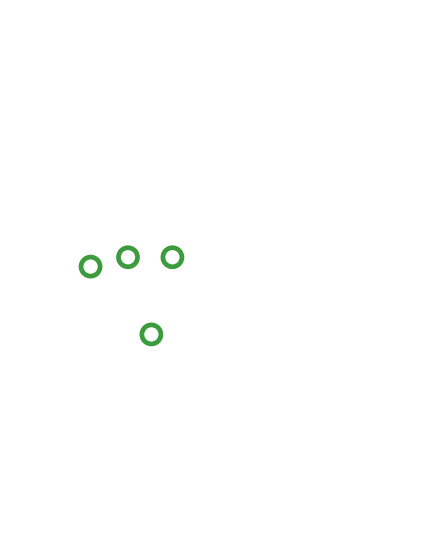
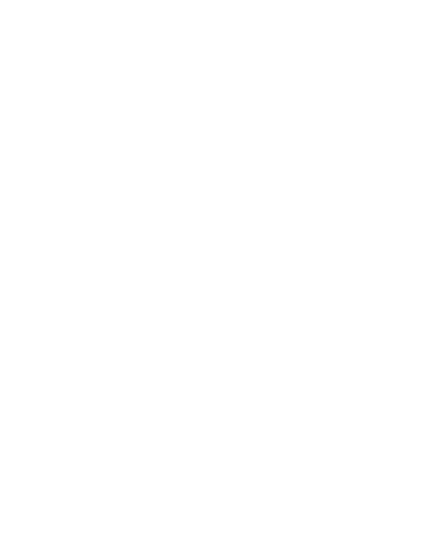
via: (127, 257) -> none
via: (172, 257) -> none
via: (90, 266) -> none
via: (151, 334) -> none

